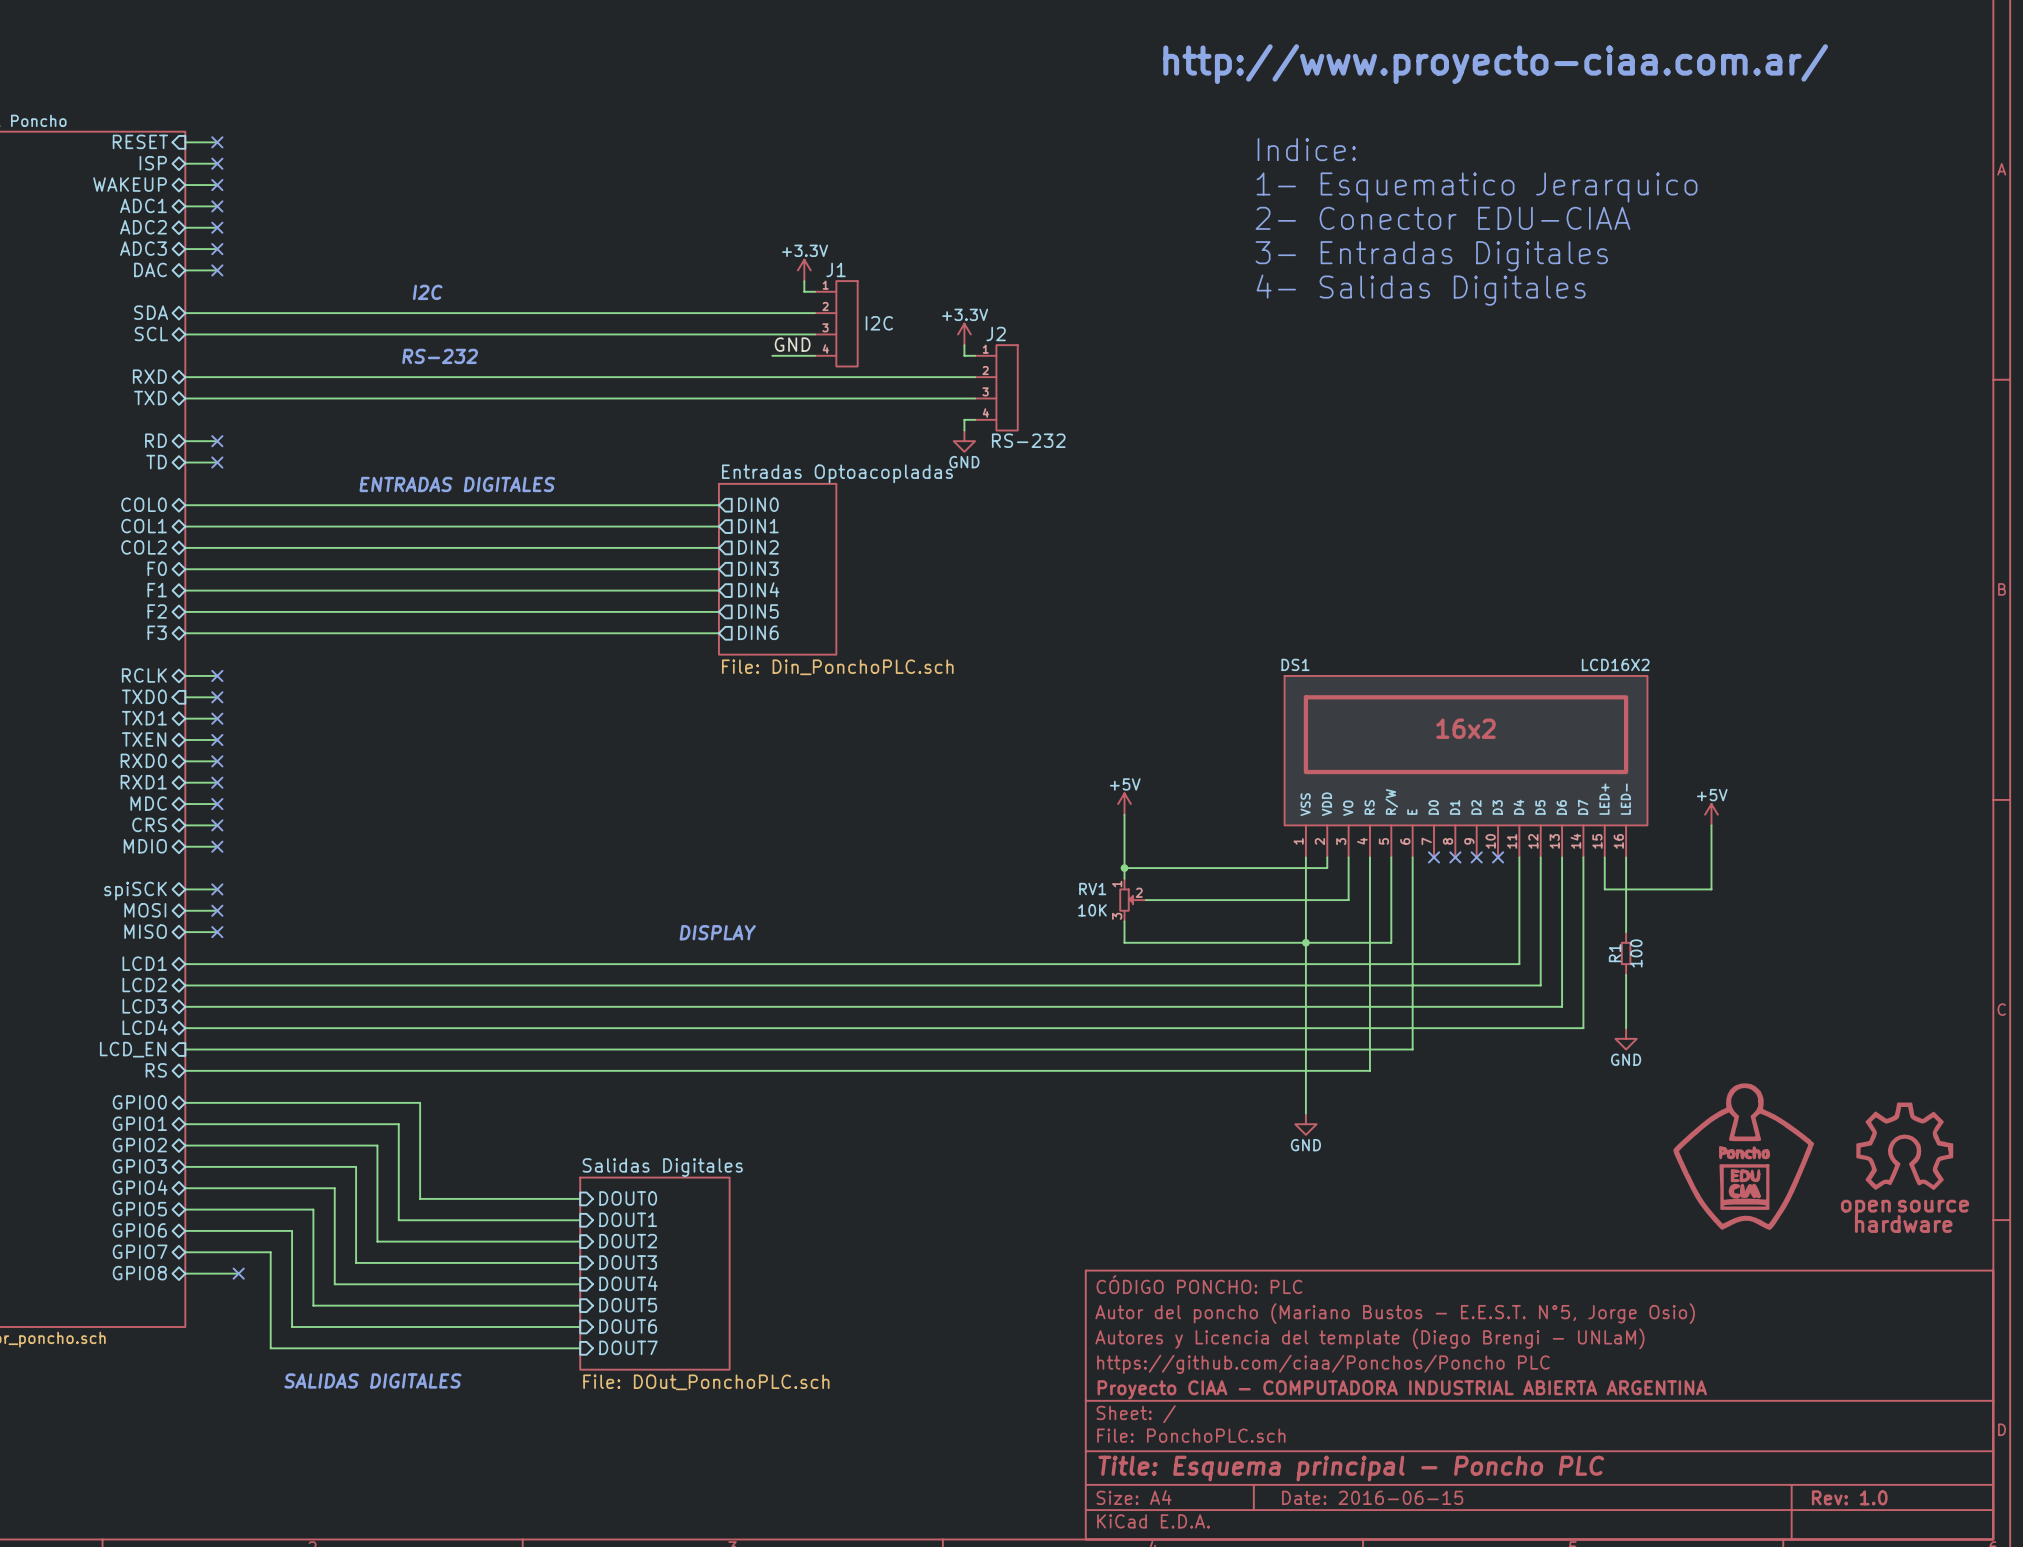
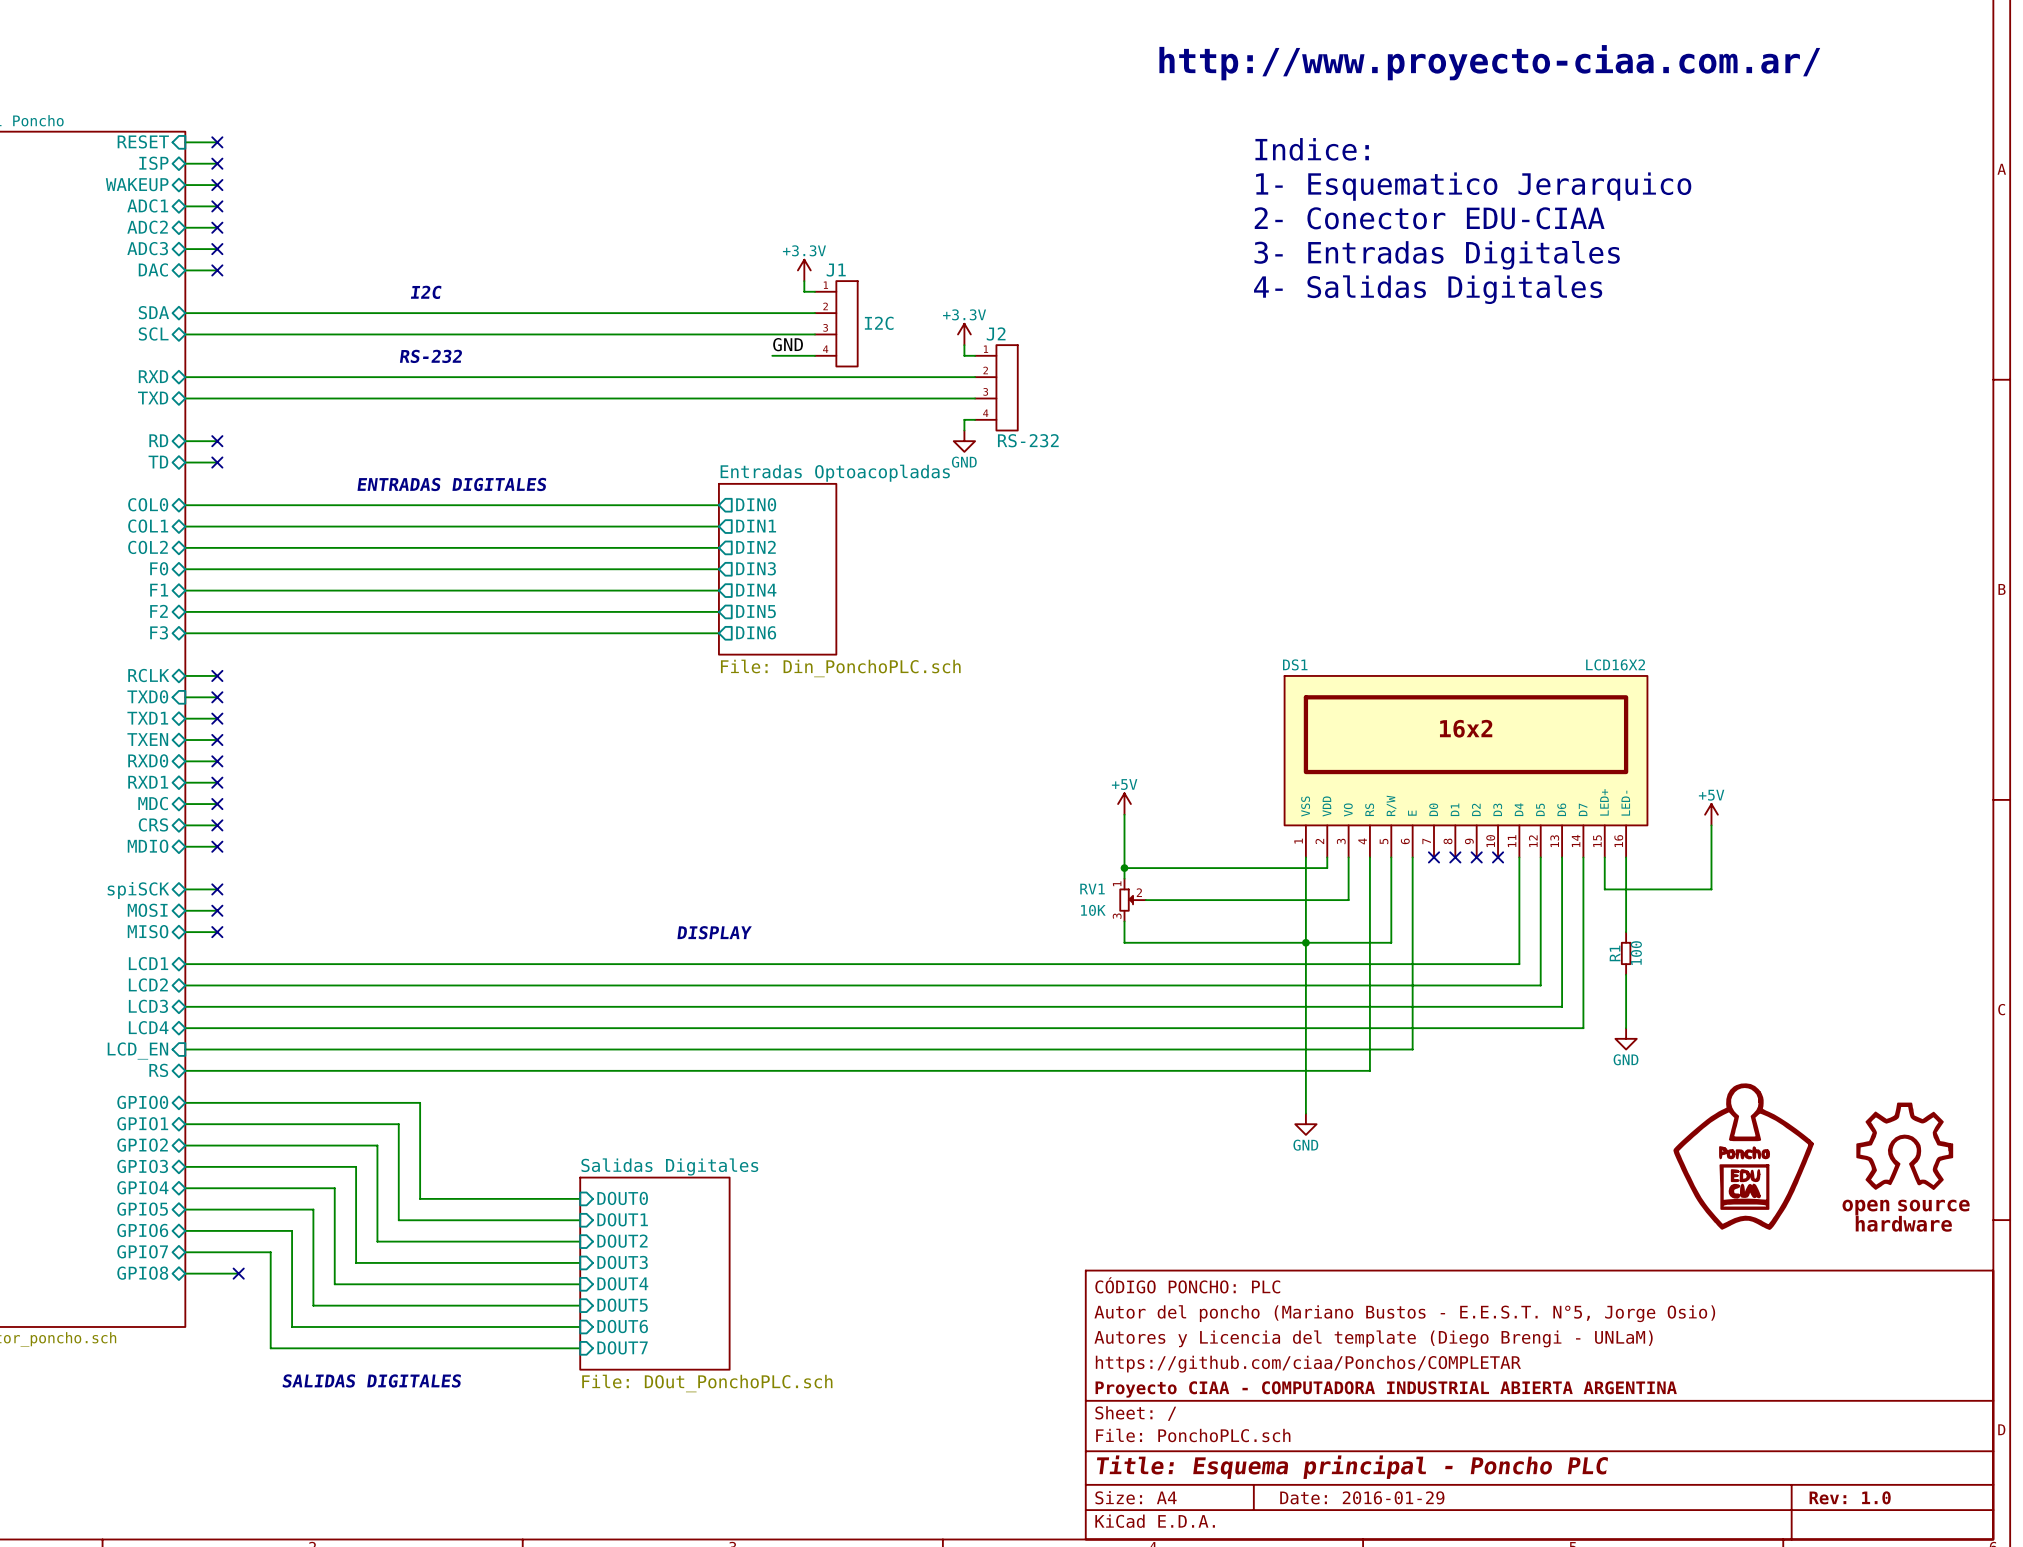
title block: https://github.com/ciaa/Ponchos/Poncho PLC (1323, 1364) -> https://github.com/ciaa/Ponchos/COMPLETAR (1308, 1364)
title block: Date: 2016-06-15 (1372, 1497) -> Date: 2016-01-29 (1362, 1497)

